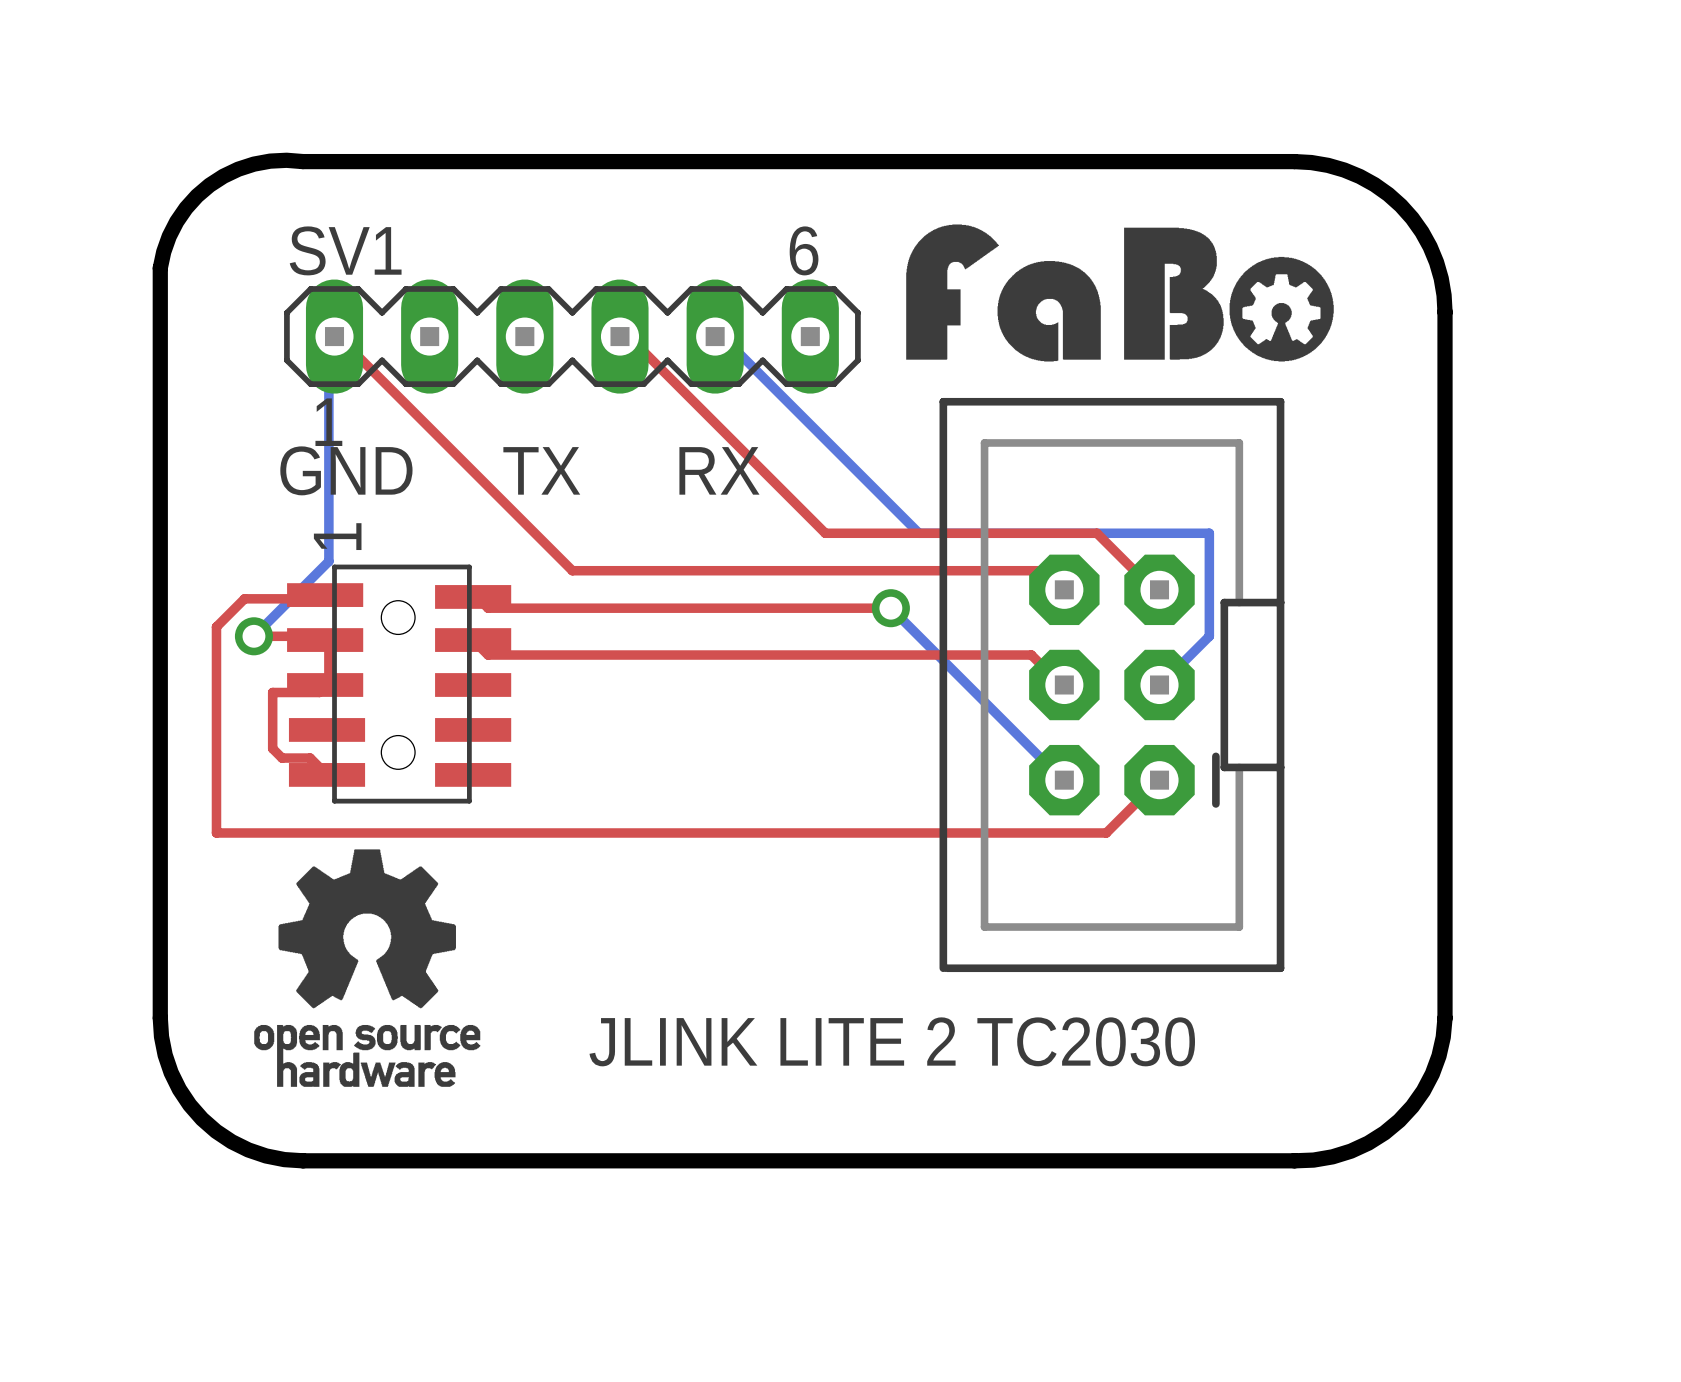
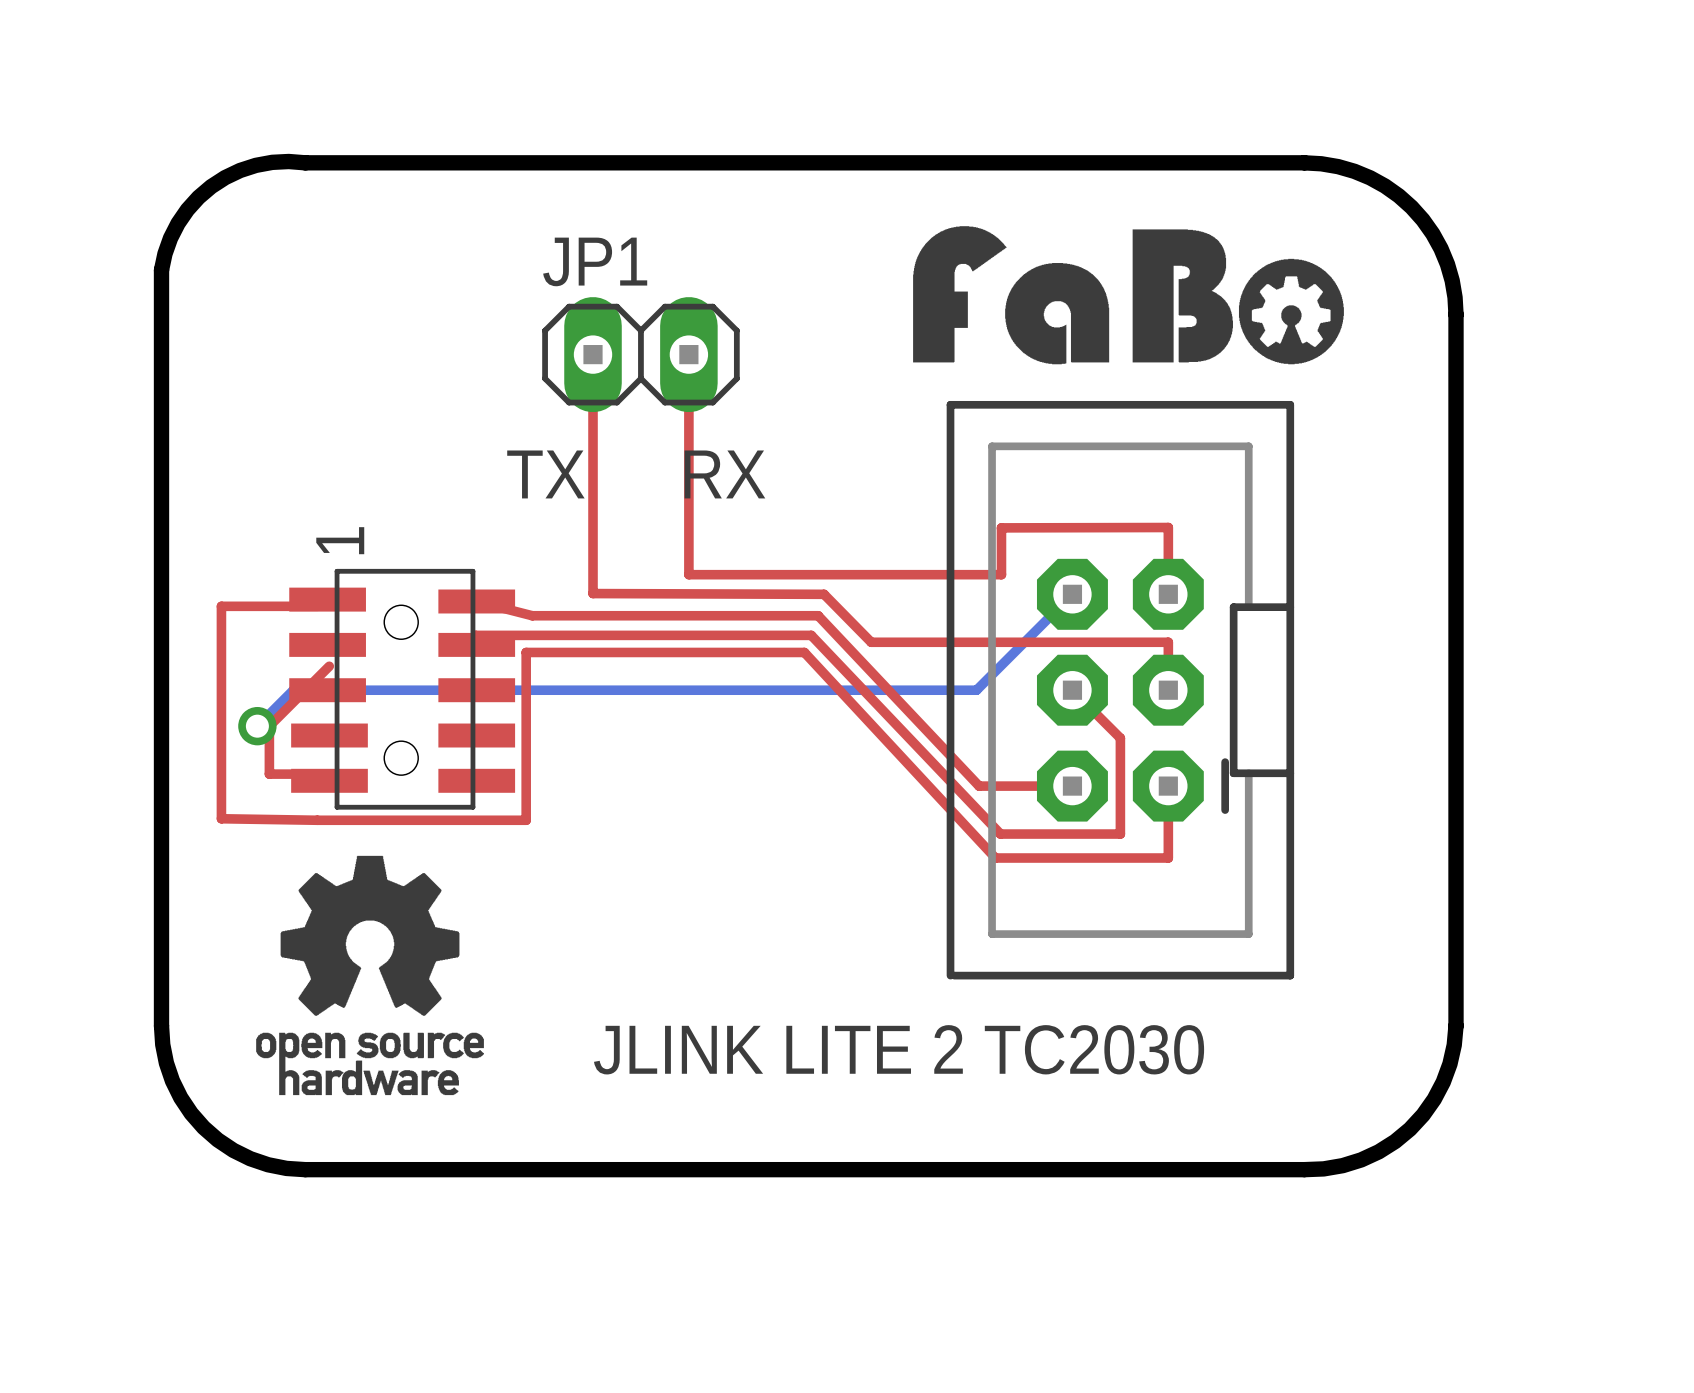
top track: (334, 336) (338, 336) (572, 570) (1040, 570) (1059, 589) (1064, 589) -> none
bottom track: (334, 336) (328, 336) (328, 561) (253, 636) -> none
SV1: (572, 336) -> none
top track: (620, 336) (628, 336) (825, 533) (1096, 533) (1153, 589) (1159, 589) -> (688, 354) (688, 574) (1001, 574) (1001, 527) (1168, 527) (1168, 594)
bottom track: (715, 336) (722, 336) (918, 533) (1209, 533) (1209, 636) (1159, 685) -> none
top track: none -> (593, 354) (593, 593) (824, 594) (871, 642) (1168, 642) (1168, 690)
JP1: none -> (640, 354)
text: GND (346, 470) -> none
bottom track: none -> (1072, 594) (976, 690) (293, 690) (257, 726)
top track: (325, 595) (319, 598) (244, 598) (216, 626) (216, 832) (1106, 832) (1159, 780) -> (327, 599) (317, 606) (221, 606) (221, 818) (526, 820) (526, 652) (804, 652) (995, 858) (1168, 858) (1168, 786)
top track: (473, 596) (478, 598) (488, 608) (890, 608) -> (476, 601) (532, 615) (818, 615) (979, 786) (1072, 786)
bottom track: (890, 608) (1064, 780) -> none
via: (890, 608) -> none
top track: (253, 636) (319, 636) (328, 645) (328, 683) (319, 692) (272, 692) (272, 748) (282, 758) (310, 758) (327, 774) -> (269, 726) (269, 774) (329, 774) (329, 780)
via position: (253, 636) -> (257, 726)
top track: (473, 640) (488, 655) (1031, 655) (1059, 683) (1064, 685) -> (476, 644) (475, 635) (811, 635) (1000, 834) (1120, 834) (1120, 738) (1072, 690)
top track: none -> (329, 666) (269, 726)

